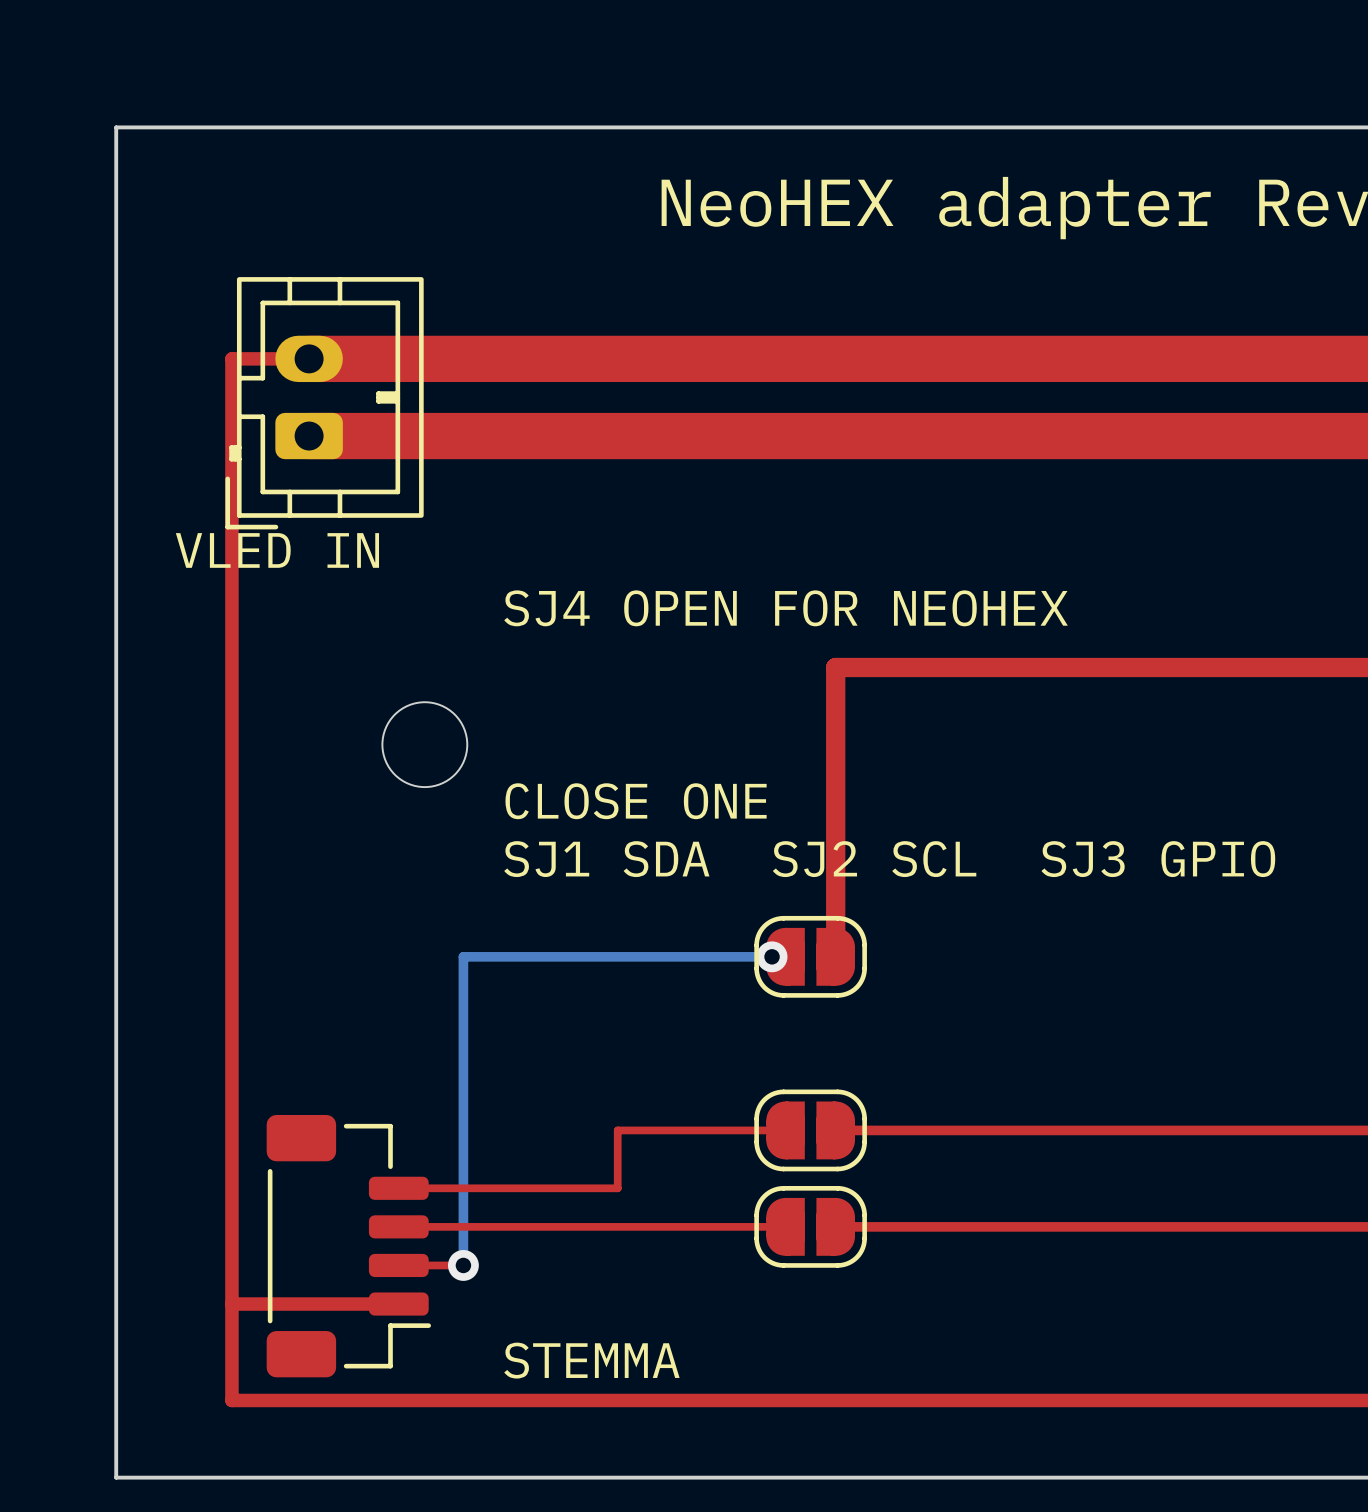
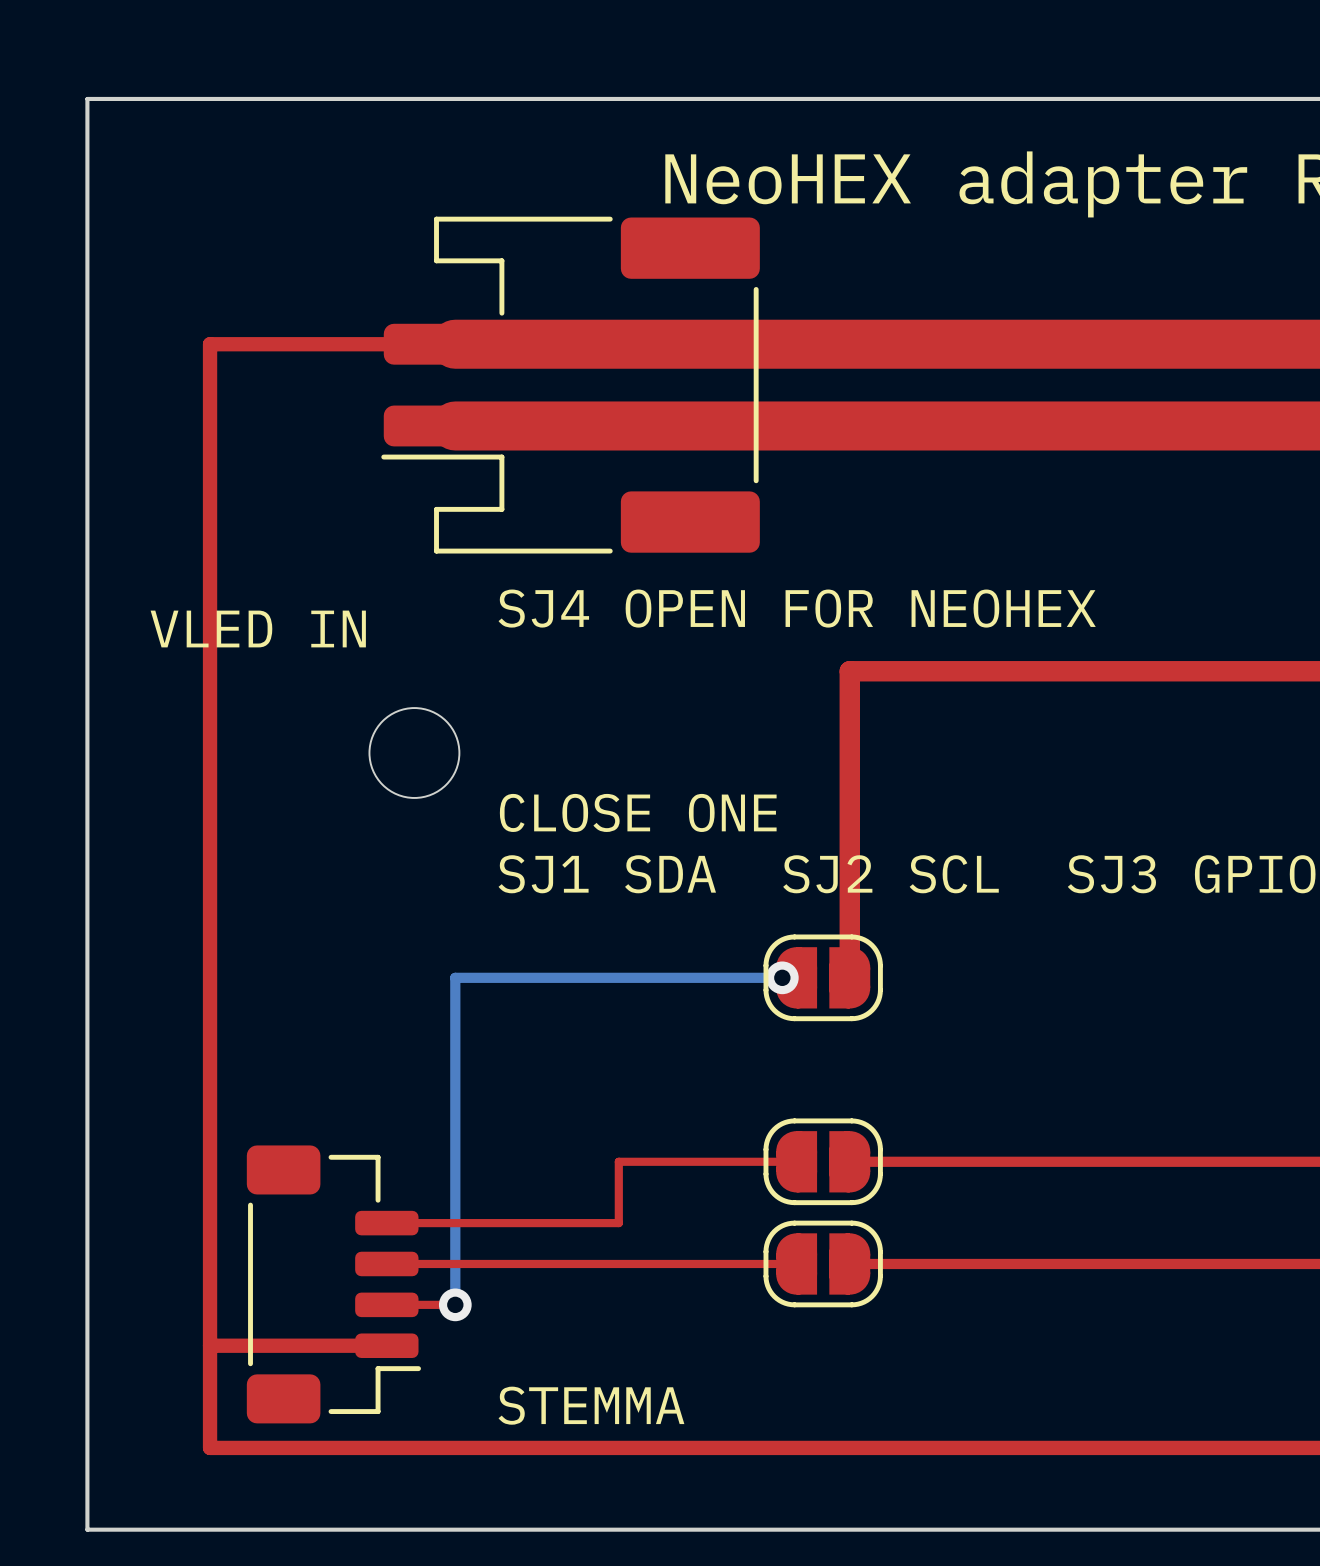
top track width: thick (309, 358) (463, 358) -> thin (291, 344) (455, 344)
part: none -> (570, 385)
part: (324, 403) -> none
top track: (309, 436) (463, 436) -> none
text position: VLED IN (277, 550) -> VLED IN (258, 628)

